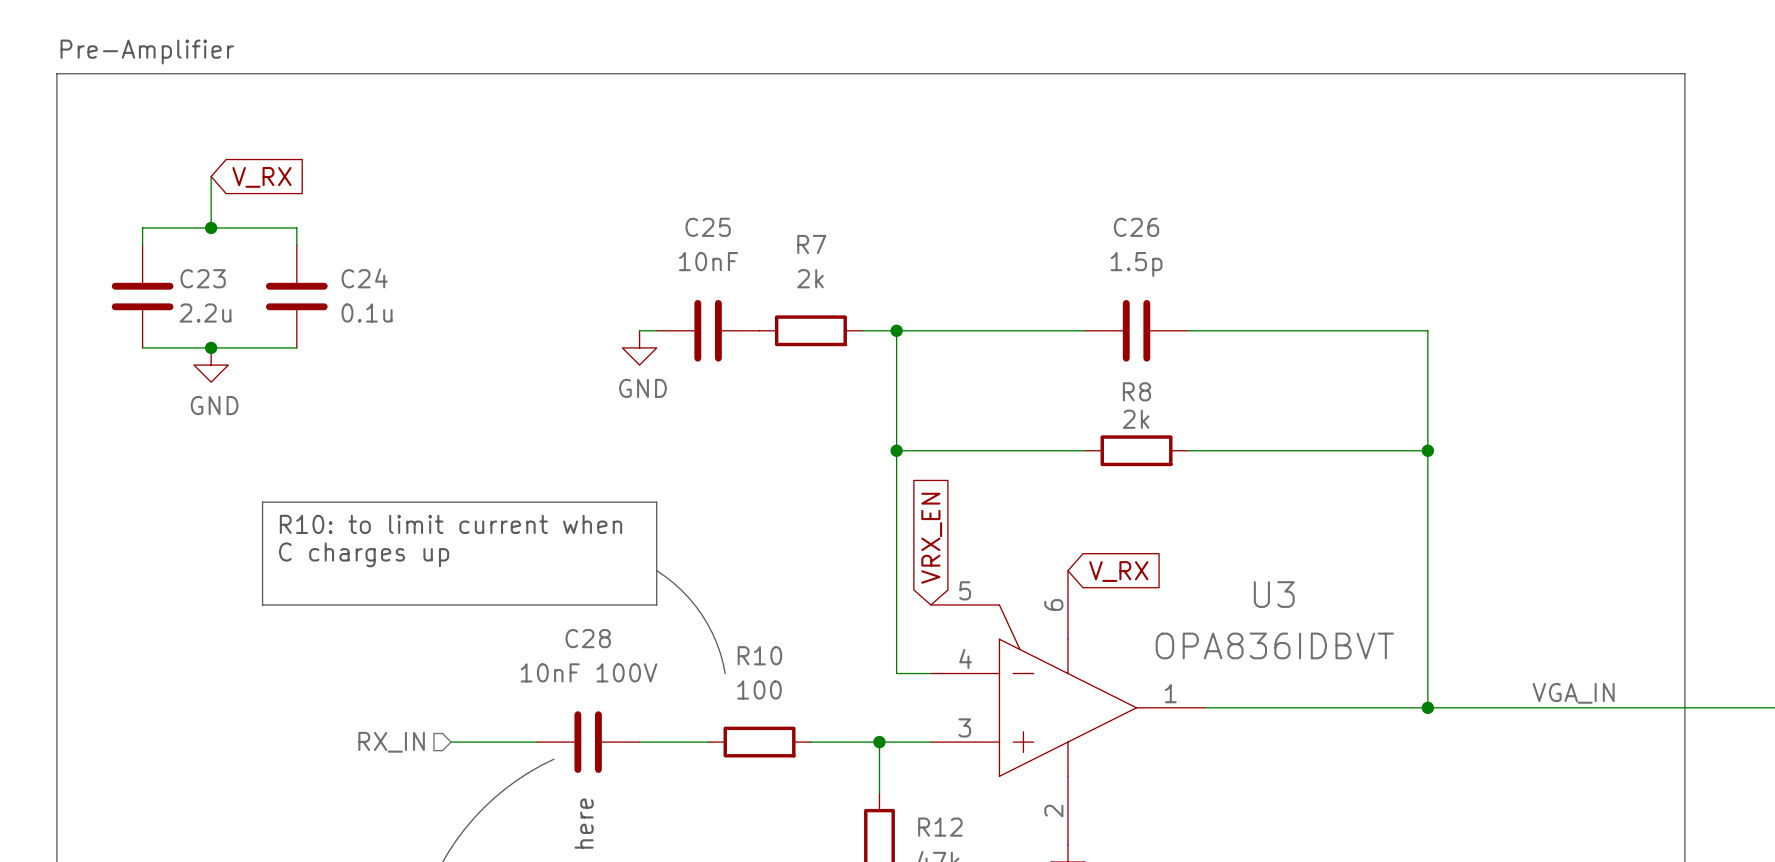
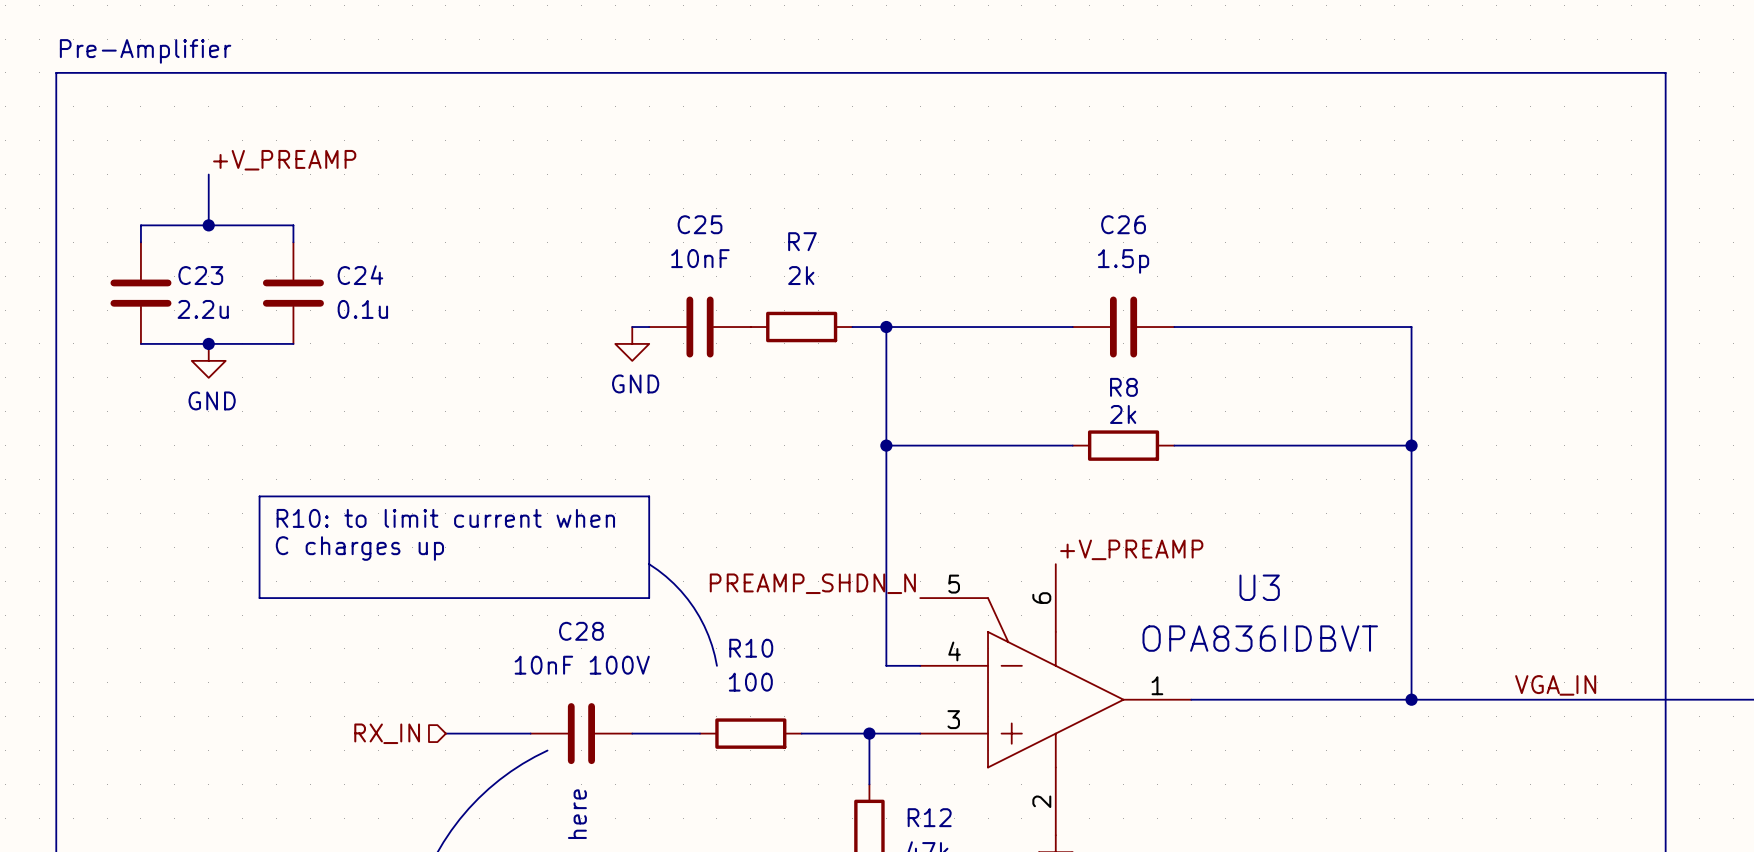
label: none -> +V_PREAMP (284, 160)
global label: V_RX (261, 177) -> none
global label: VRX_EN (931, 538) -> none
label: none -> +V_PREAMP (1131, 549)
global label: V_RX (1118, 571) -> none
label: none -> PREAMP_SHDN_N (812, 583)

